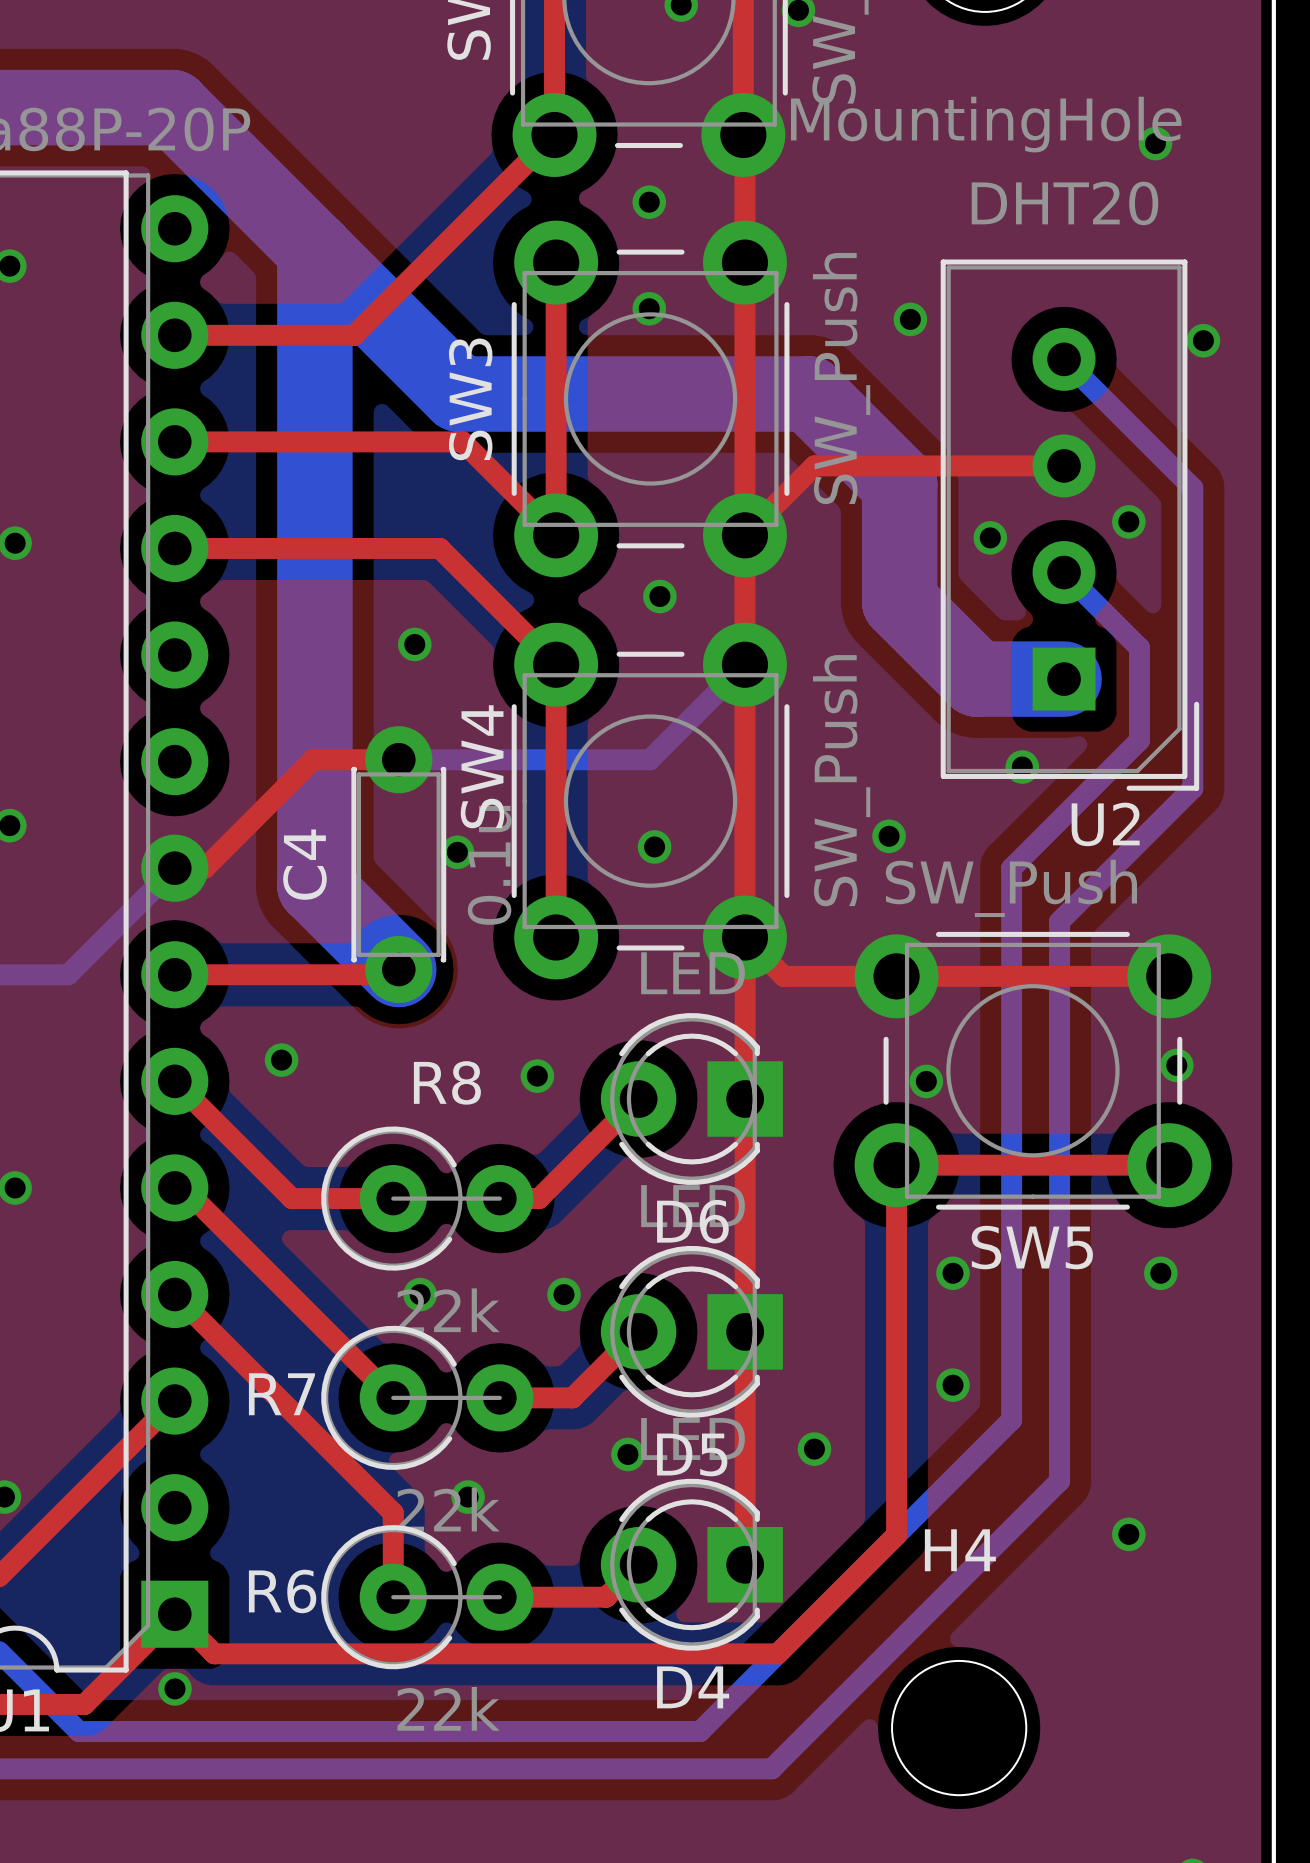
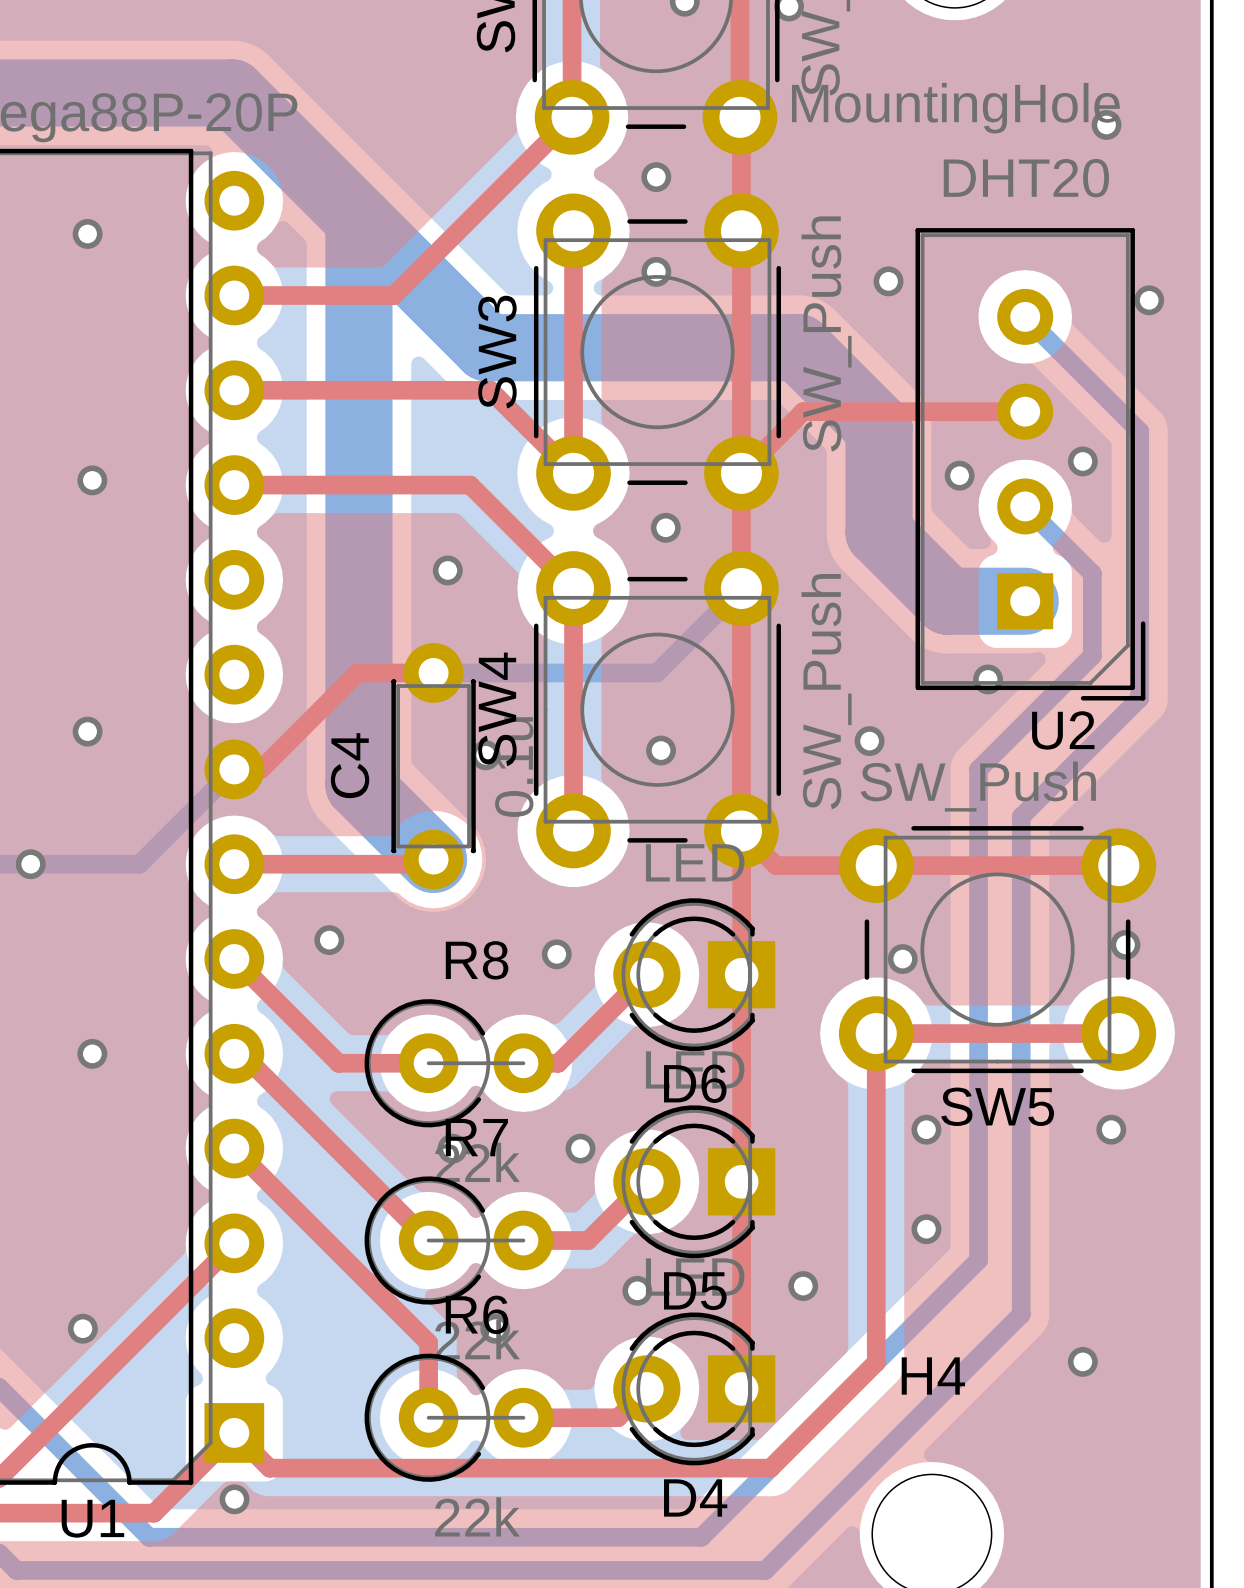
SW4 name position: SW4 (482, 766) -> SW4 (497, 709)
R7 name position: R7 (281, 1394) -> R7 (476, 1137)
R6 name position: R6 (282, 1591) -> R6 (477, 1314)

